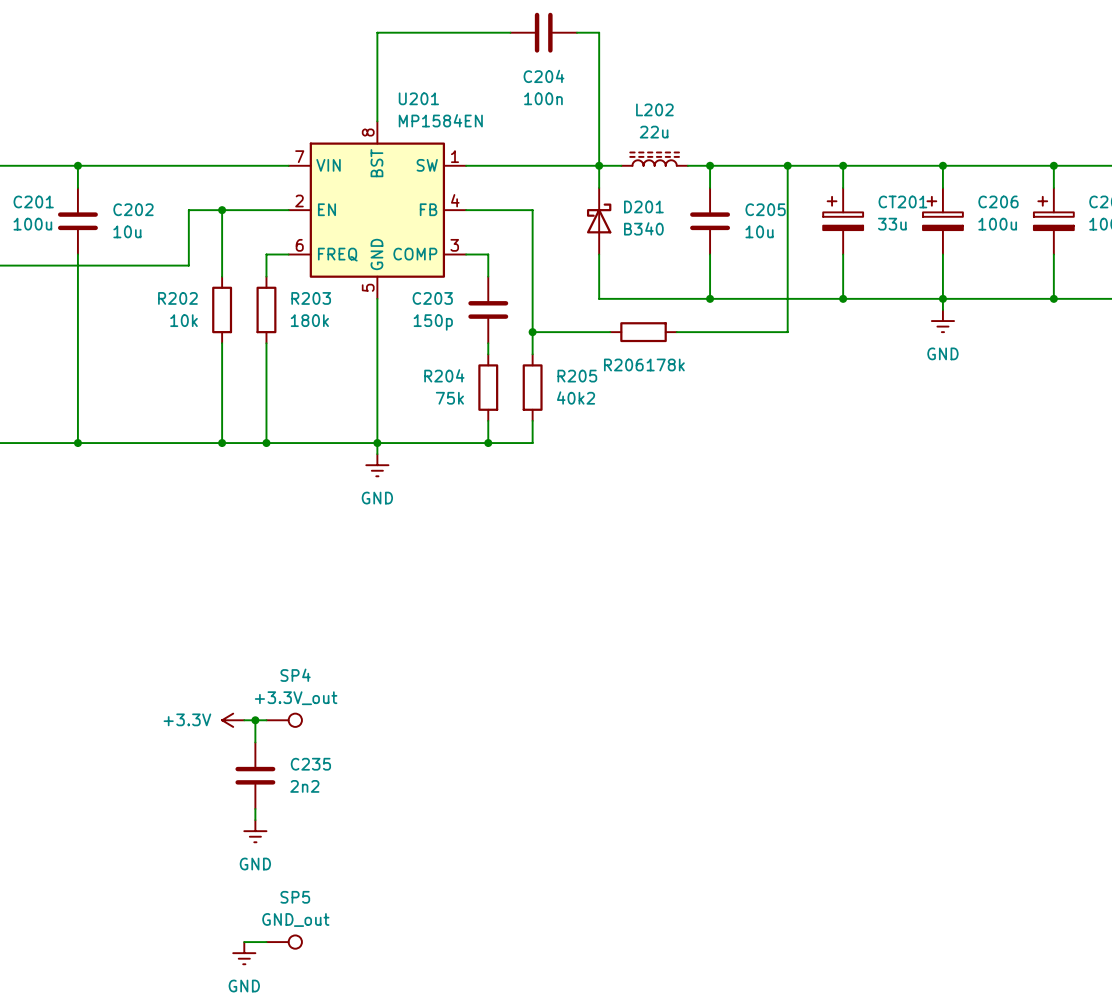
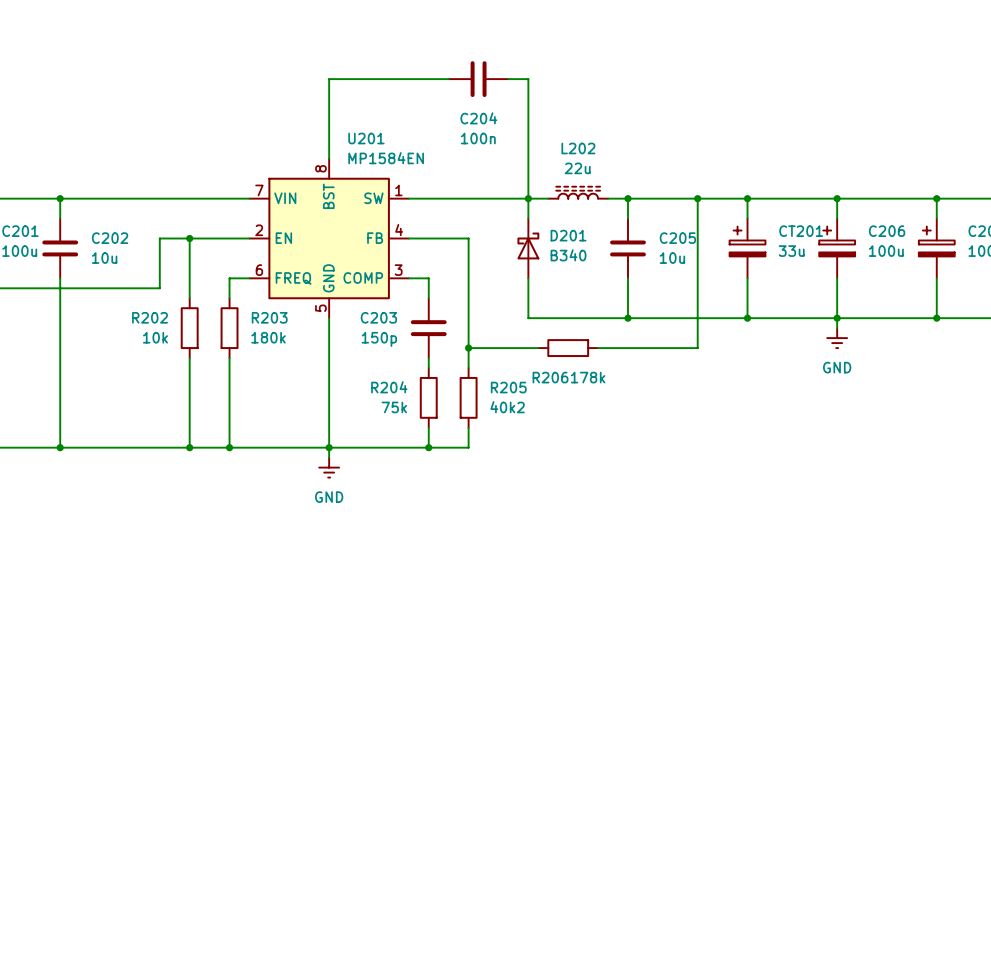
power symbol: +3.3V (233, 720) -> none
wire: (244, 720) (266, 720) -> none
wire: (255, 720) (255, 742) -> none
junction: (255, 720) -> none
SP4: +3.3V_out (284, 720) -> none
C235: 2n2 (255, 775) -> none
wire: (255, 809) (255, 820) -> none
power symbol: GND (255, 831) -> none
wire: (244, 942) (266, 942) -> none
SP5: GND_out (284, 942) -> none
power symbol: GND (244, 953) -> none

